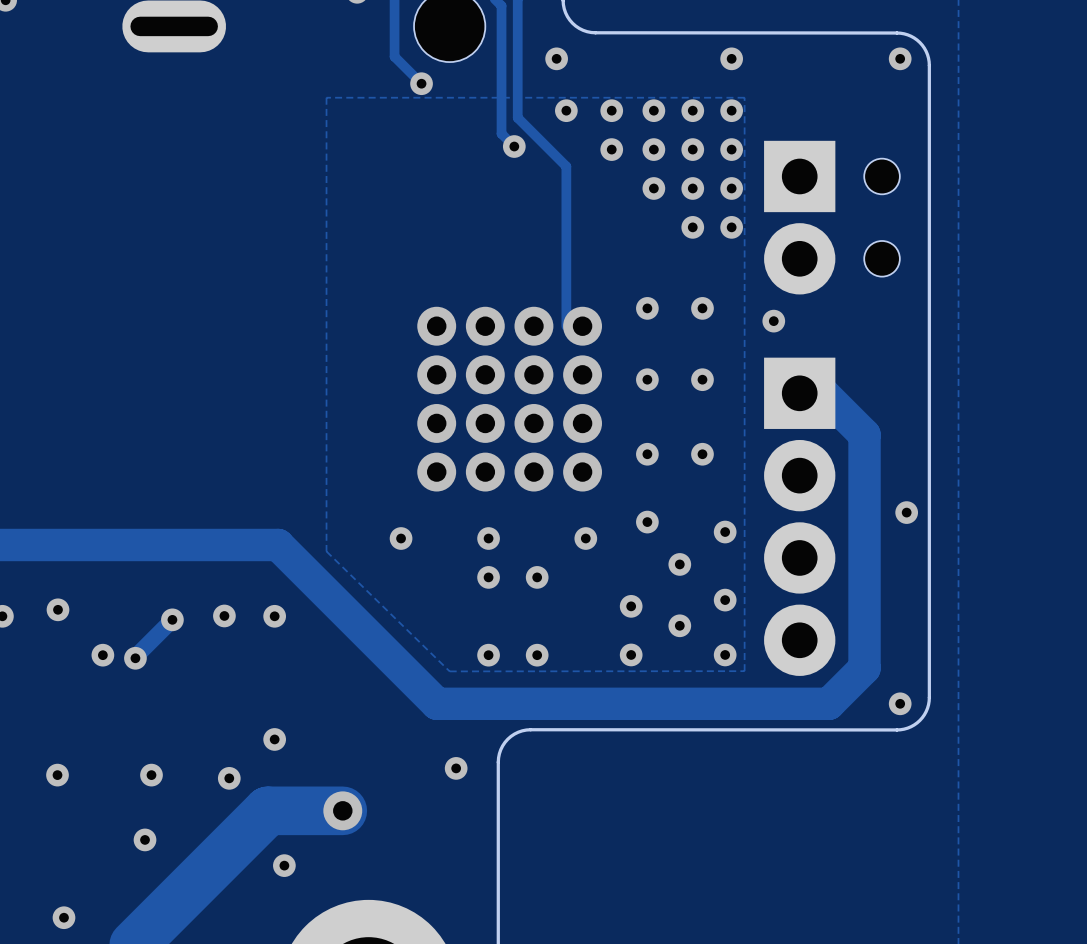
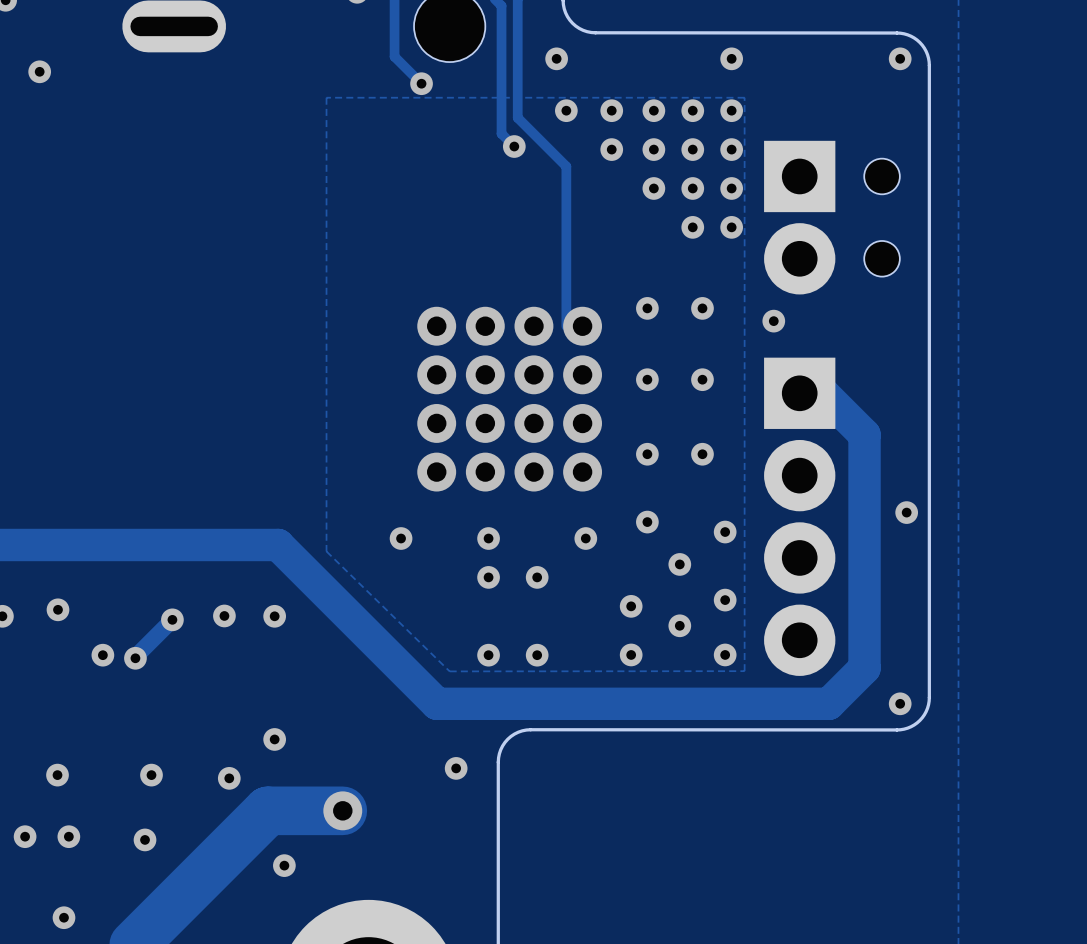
via: none -> (39, 71)
via: none -> (25, 836)
via: none -> (68, 836)

